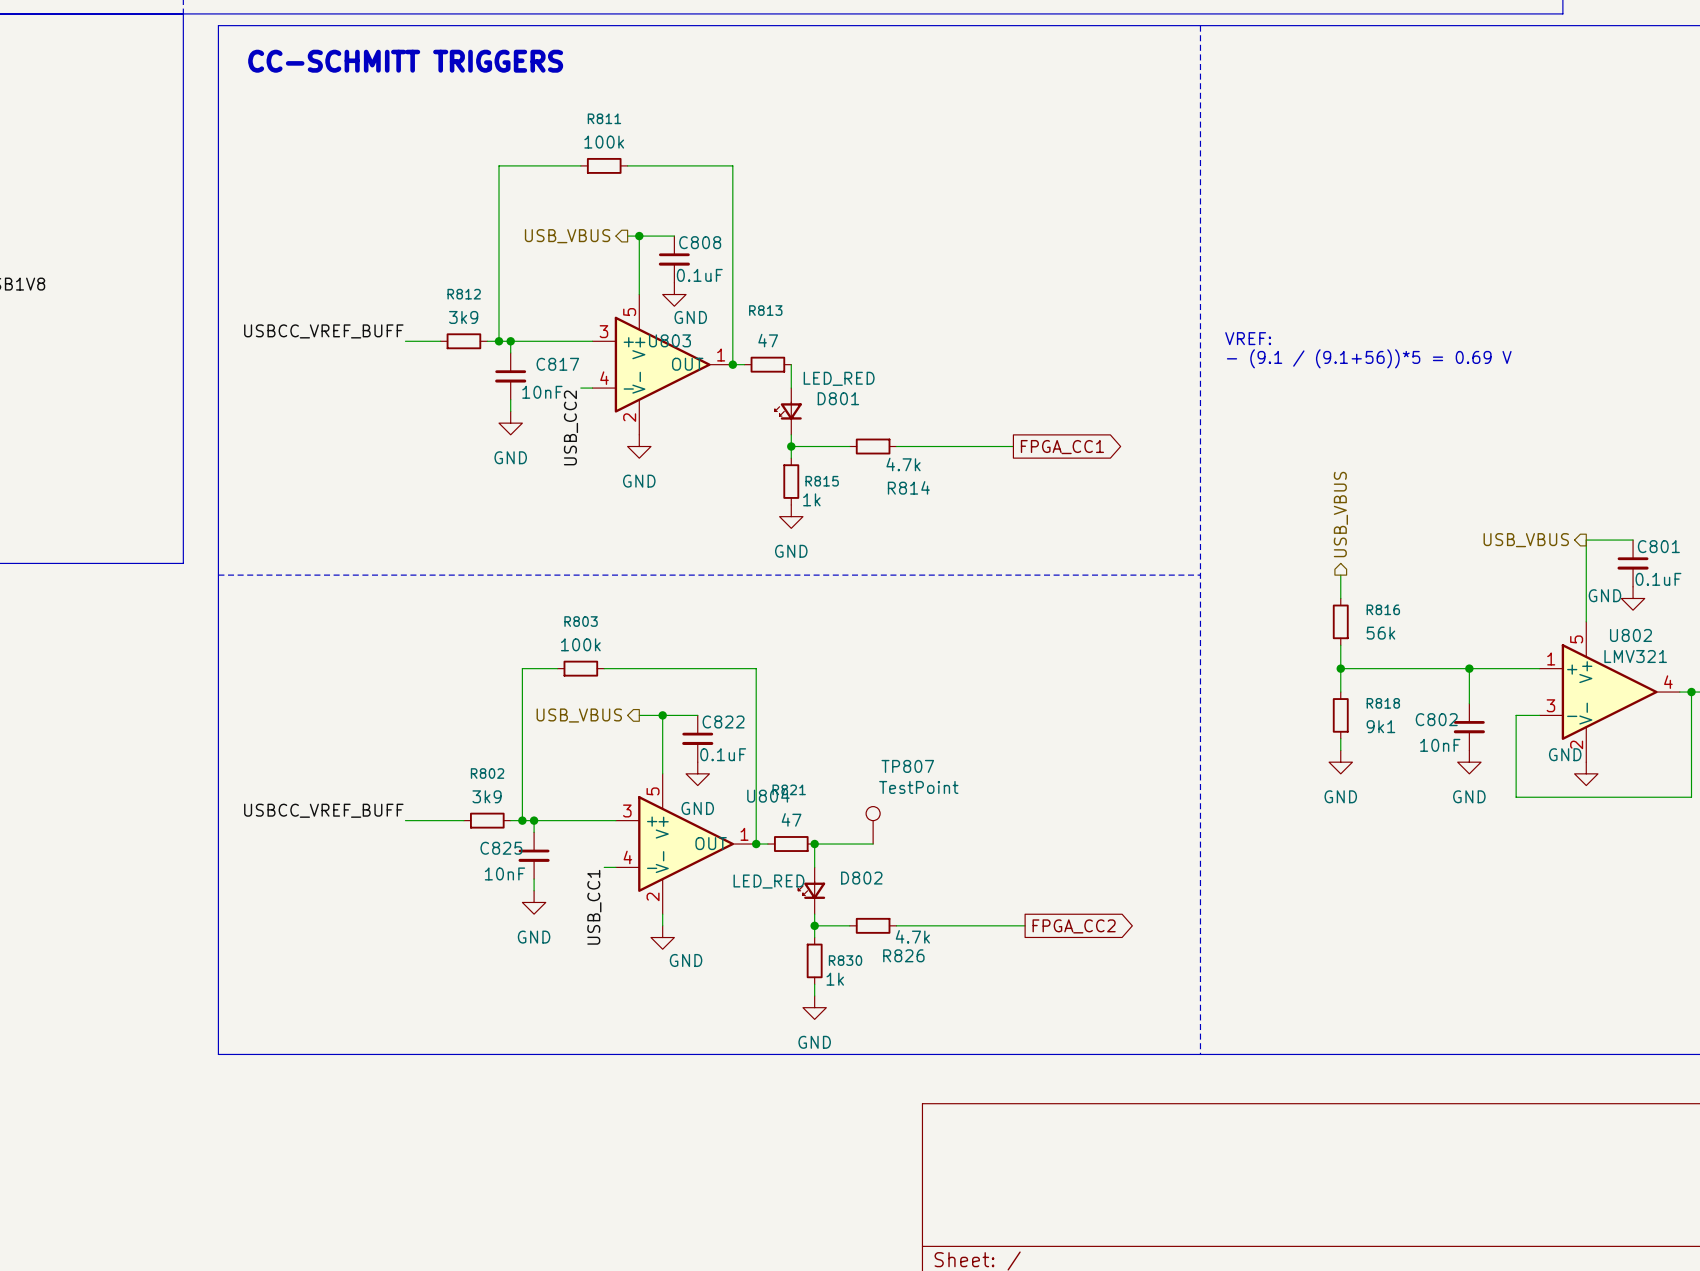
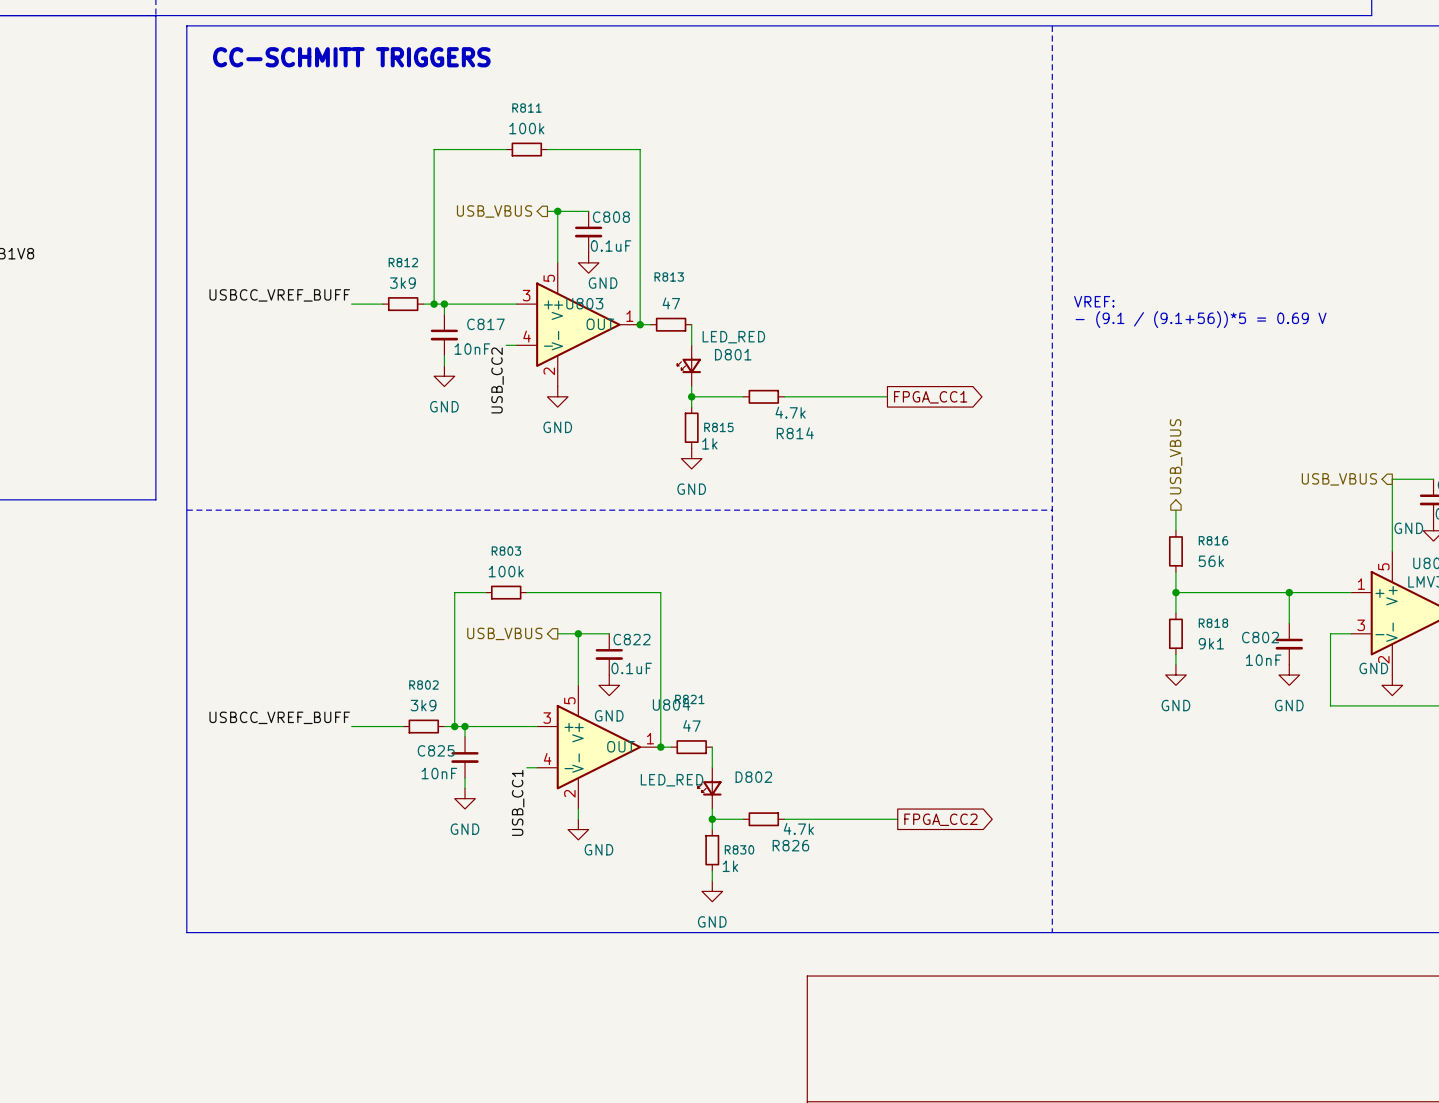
TP807: TestPoint (873, 825) -> none
wire: (814, 844) (873, 844) -> none
junction: (814, 844) -> none

